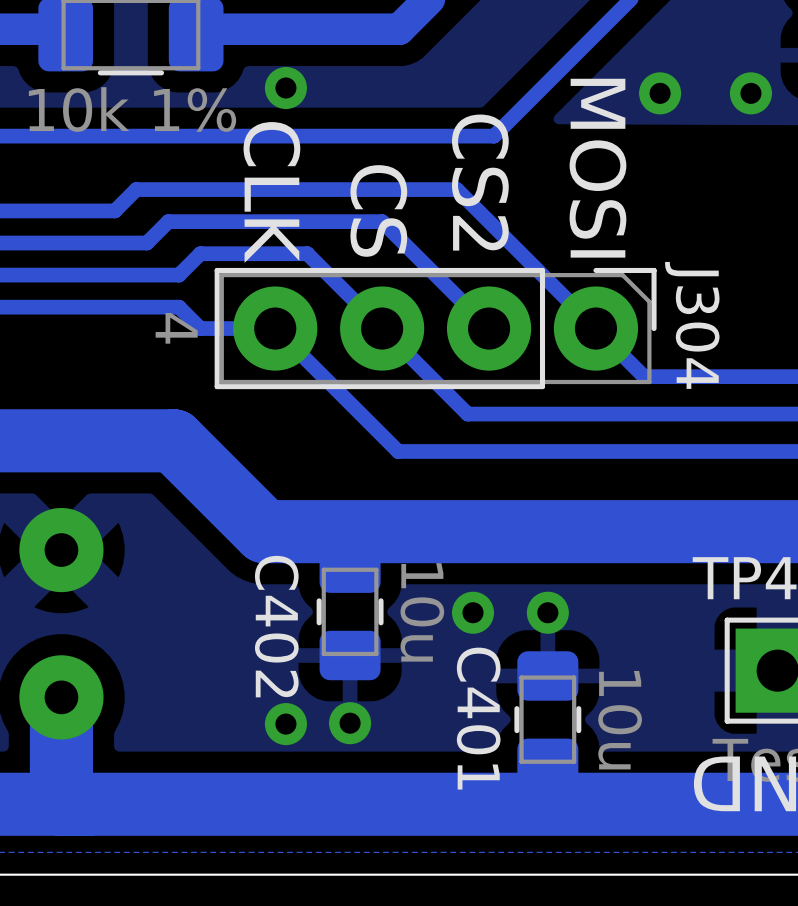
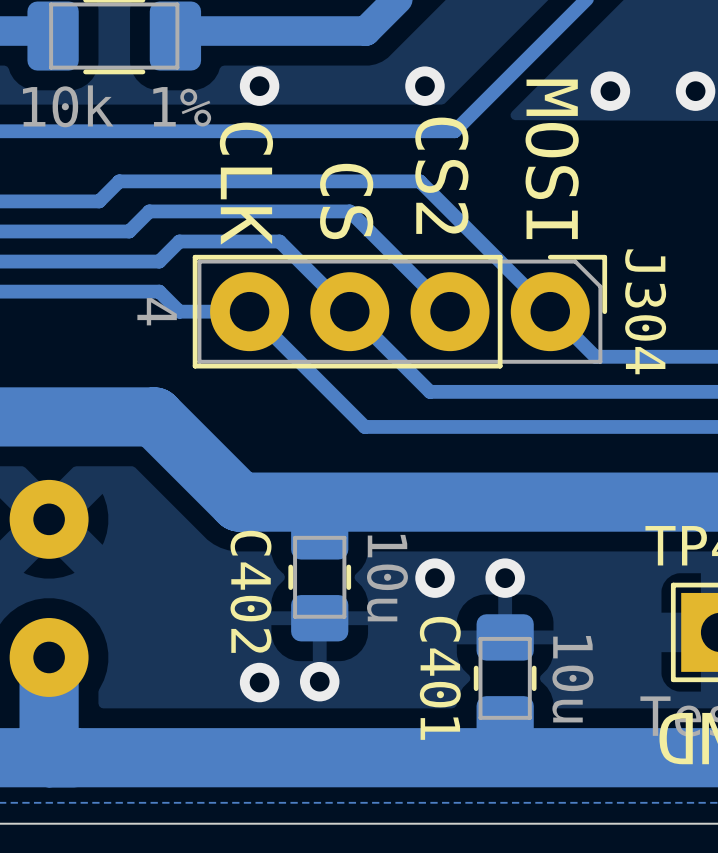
via: none -> (424, 86)

